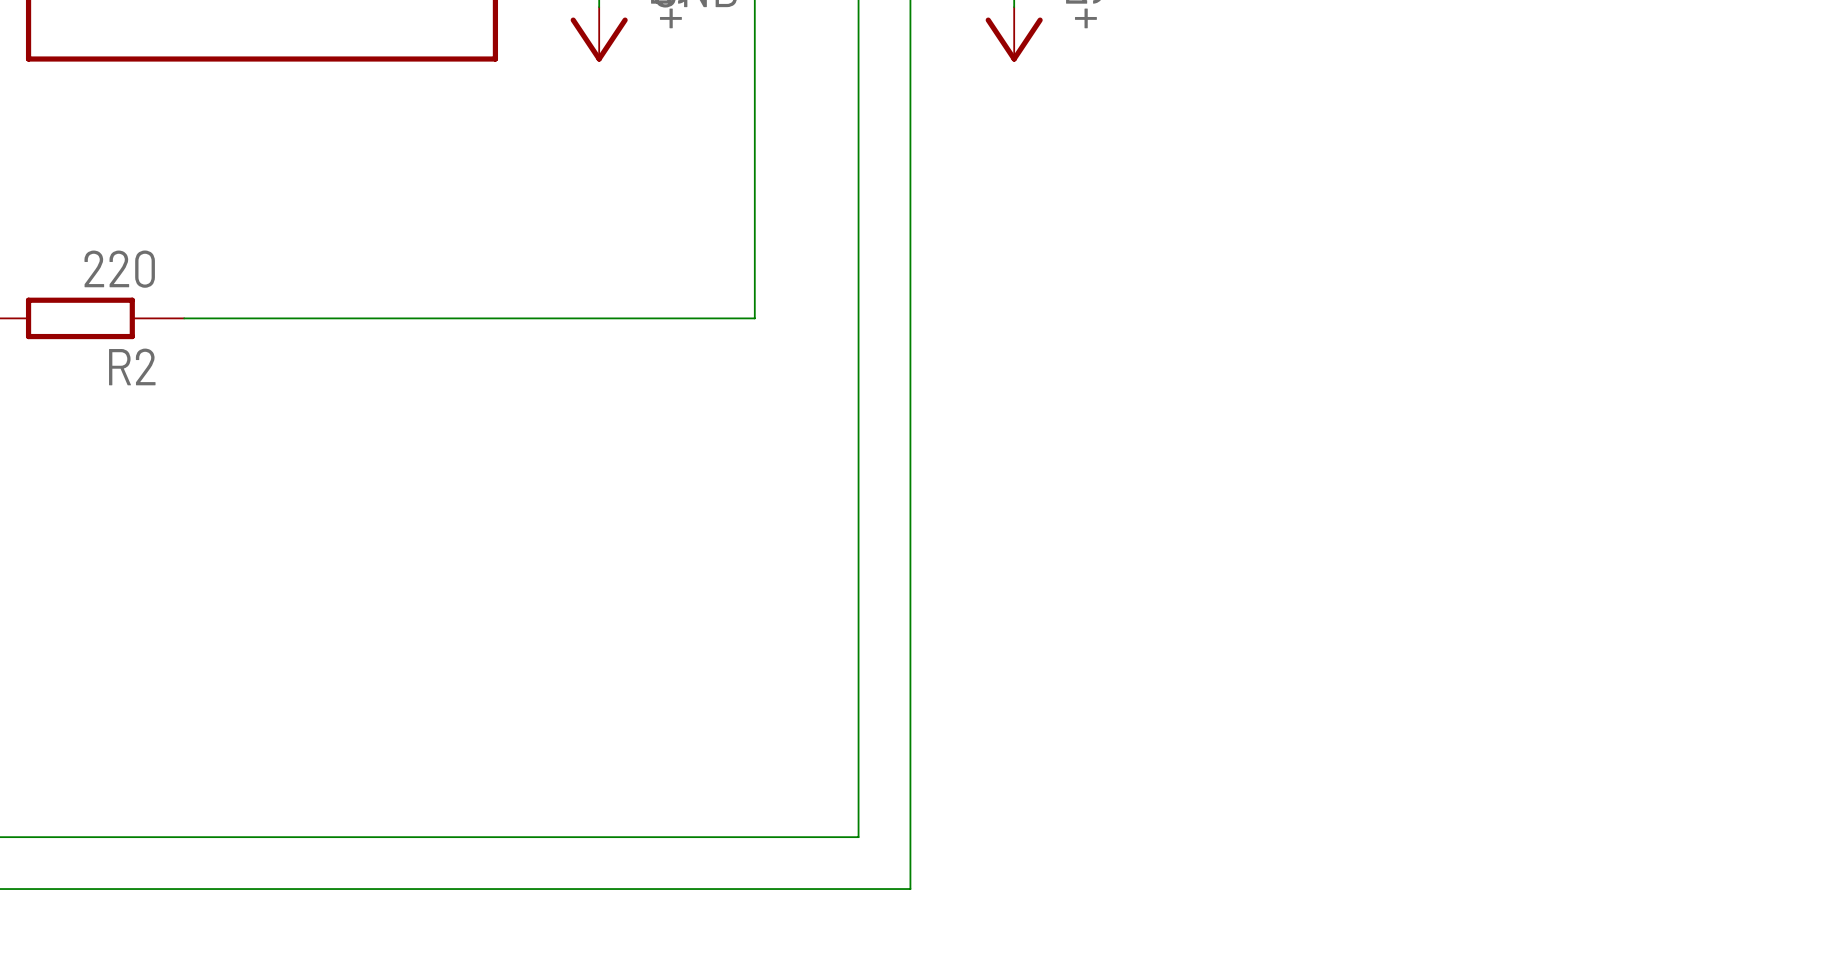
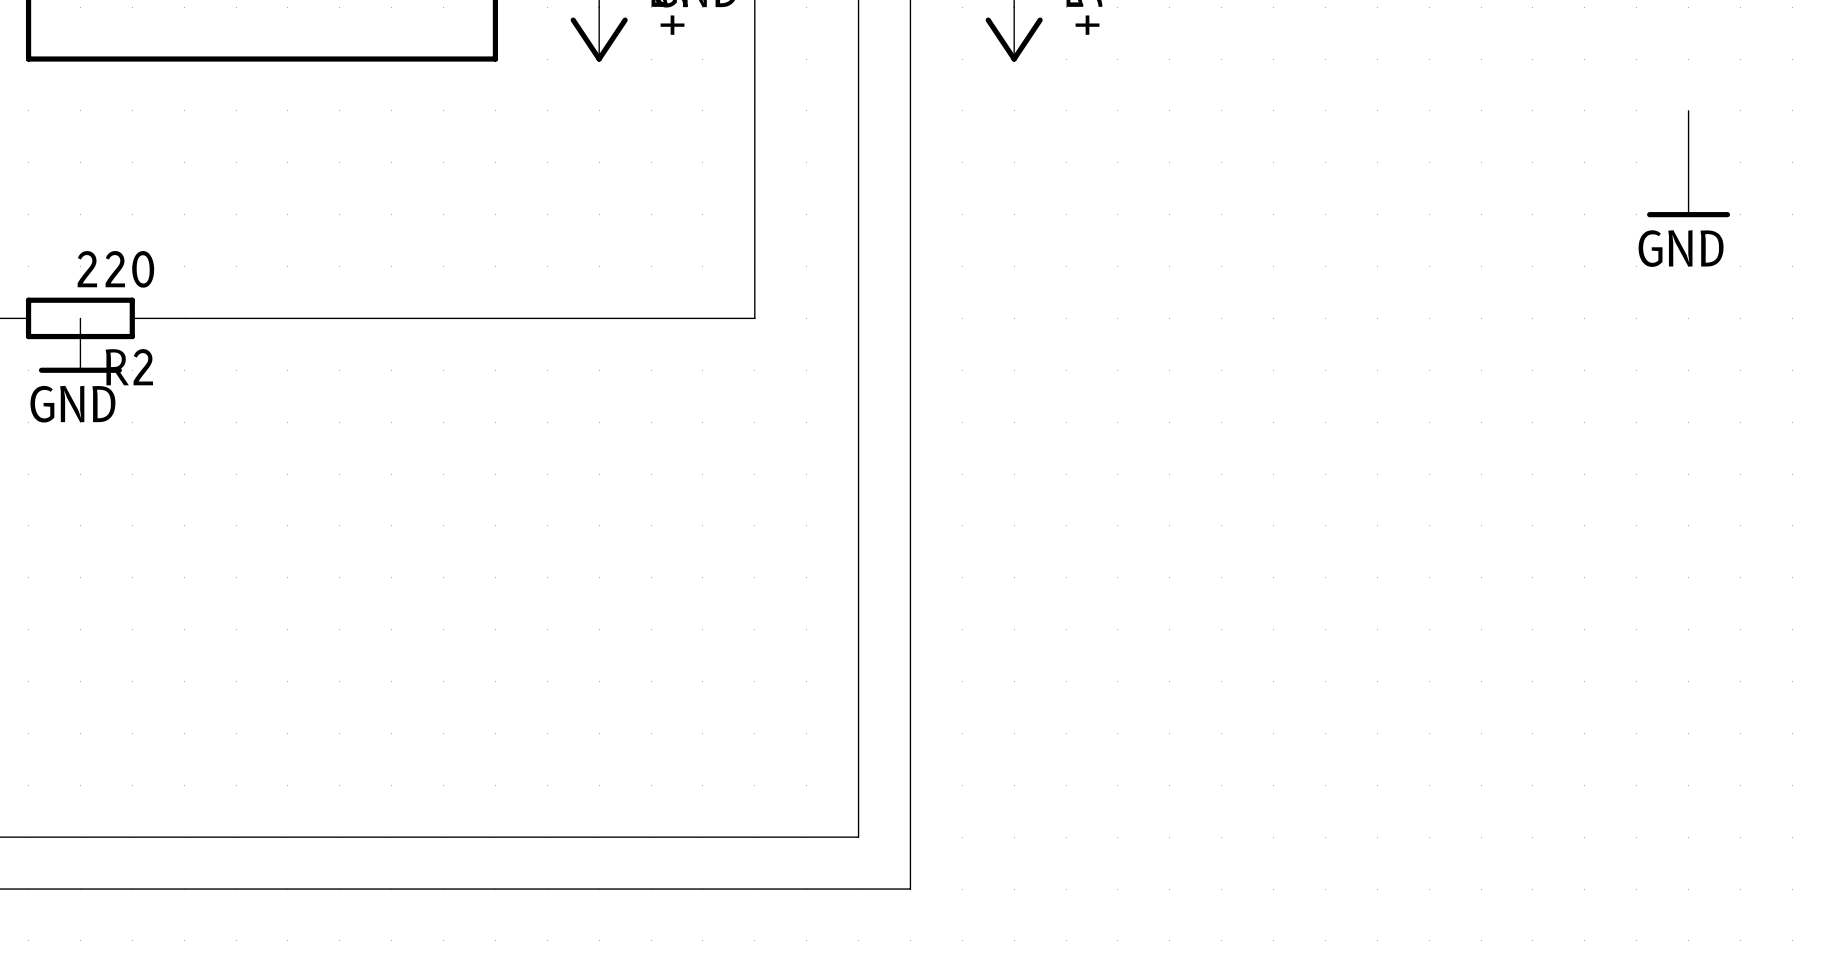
wire: none -> (1688, 110) (1688, 162)
power symbol: none -> GND (1688, 190)
power symbol: none -> GND (80, 345)

